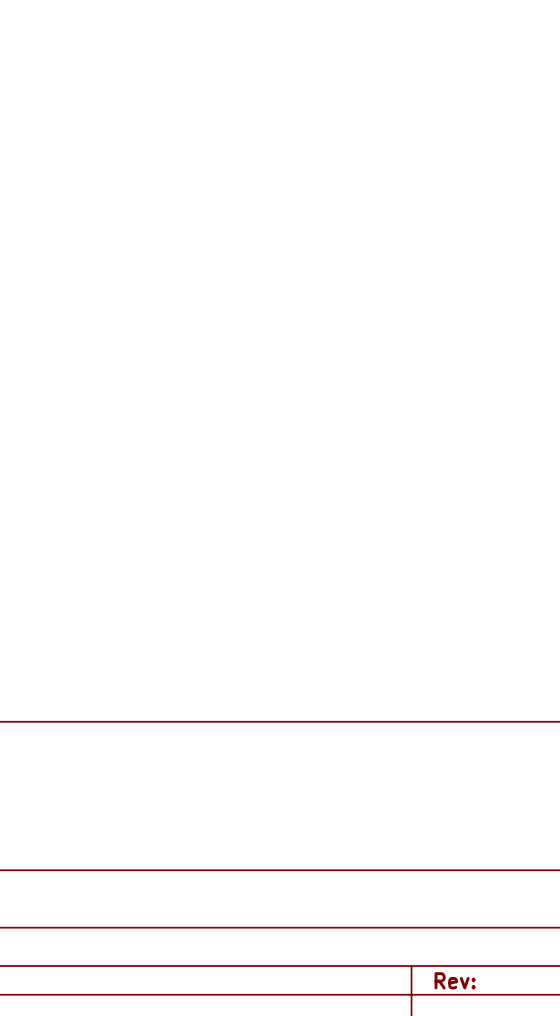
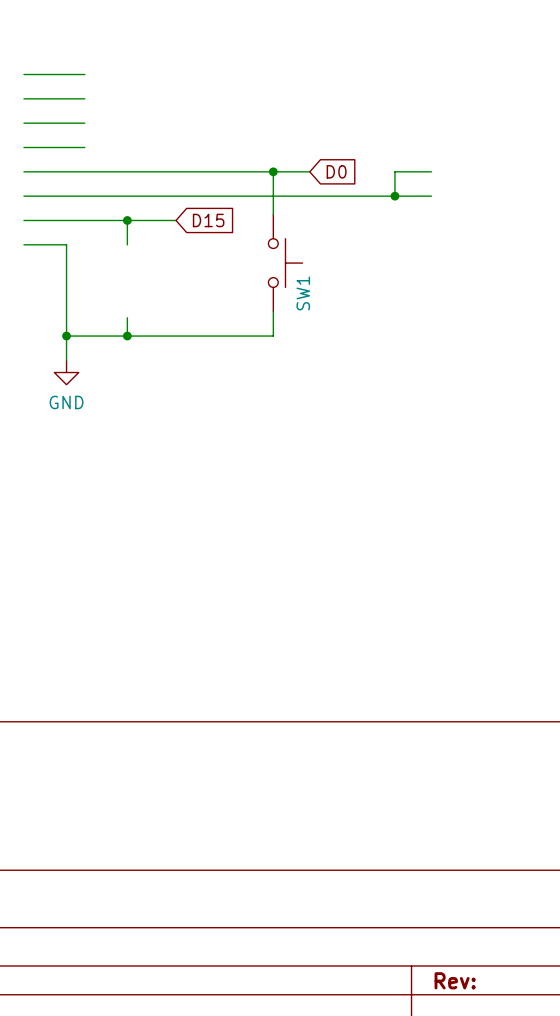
wire: none -> (23, 74) (84, 74)
wire: none -> (23, 98) (84, 98)
wire: none -> (23, 123) (84, 123)
wire: none -> (23, 147) (84, 147)
wire: none -> (23, 171) (309, 171)
wire: none -> (273, 171) (273, 214)
junction: none -> (273, 171)
global label: none -> D0 (336, 171)
wire: none -> (431, 171) (394, 171) (394, 196)
wire: none -> (23, 196) (431, 196)
junction: none -> (394, 196)
wire: none -> (23, 220) (176, 220)
wire: none -> (127, 220) (127, 244)
junction: none -> (127, 220)
global label: none -> D15 (208, 220)
wire: none -> (23, 244) (66, 244) (66, 360)
SW1: none -> (285, 263)
wire: none -> (273, 311) (273, 336) (66, 336)
wire: none -> (127, 317) (127, 336)
junction: none -> (66, 336)
junction: none -> (127, 336)
power symbol: none -> GND (66, 372)

